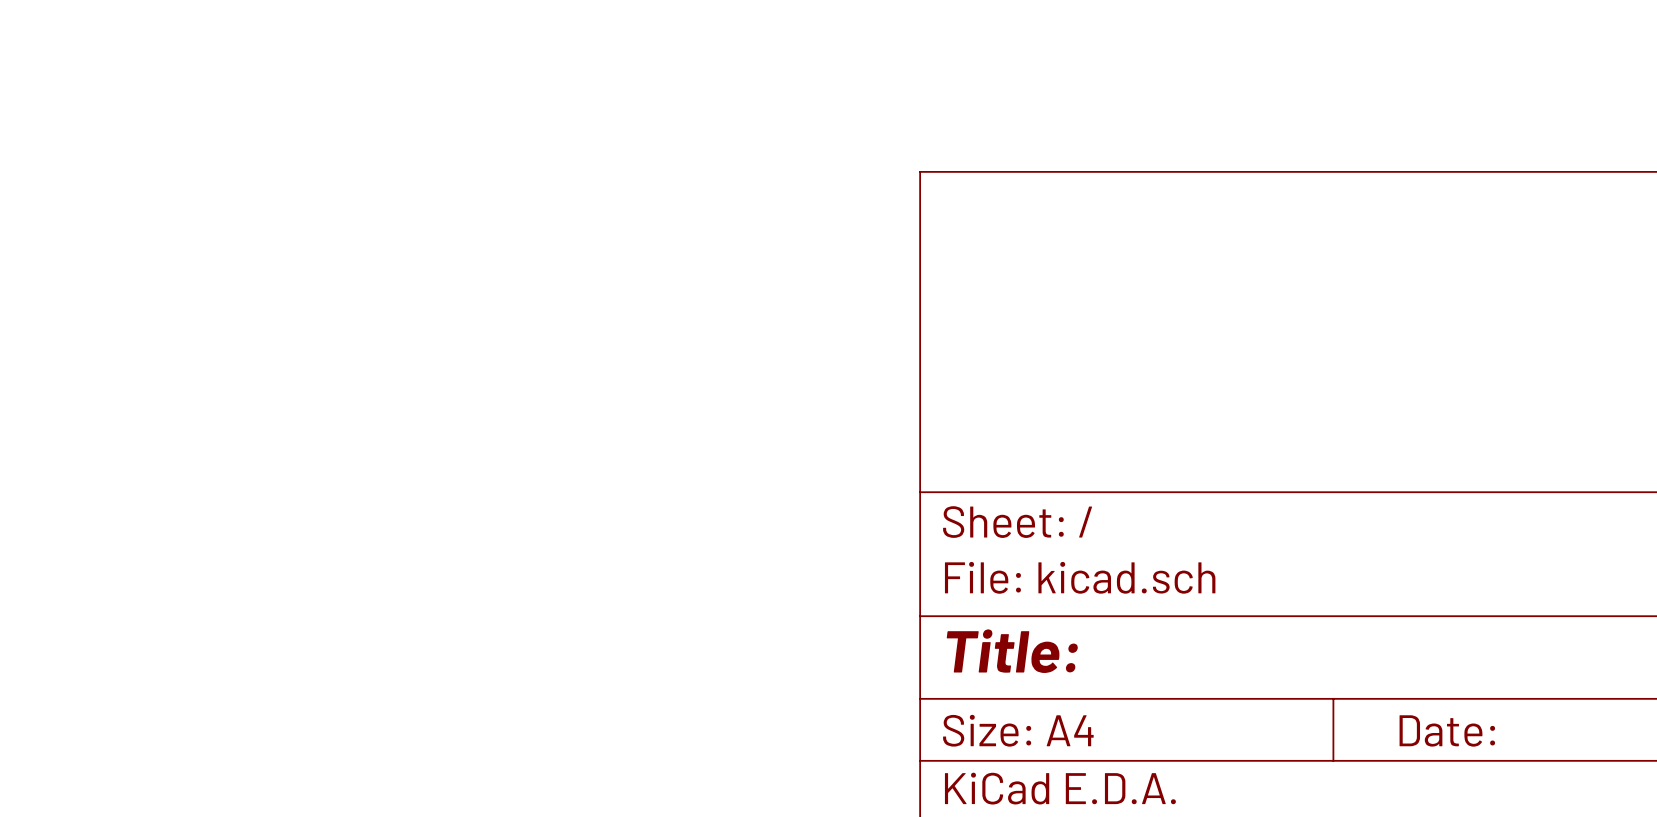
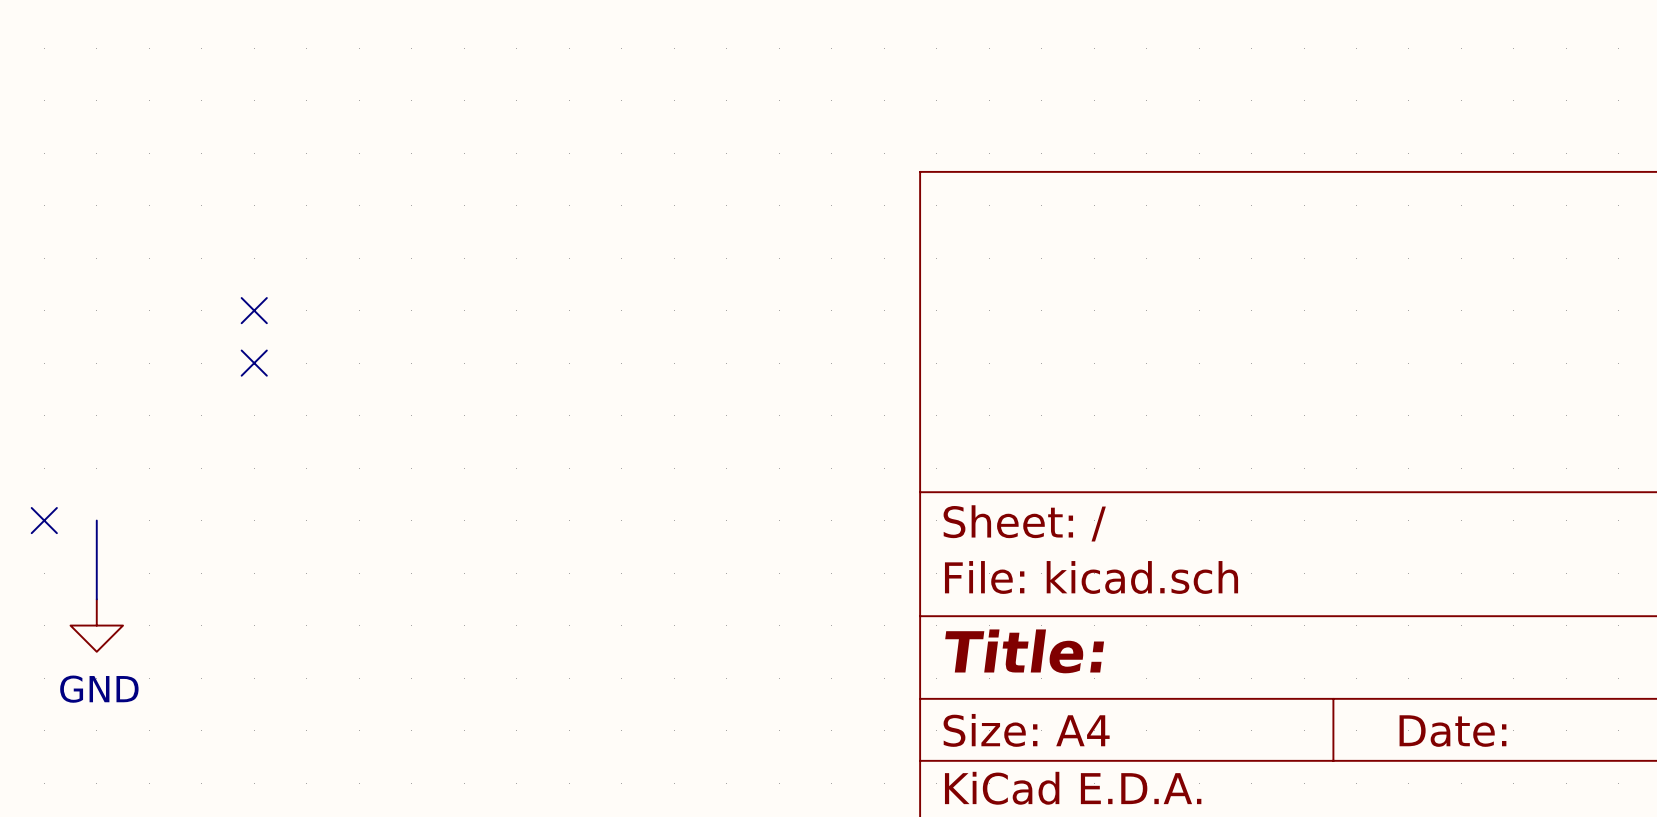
no-connect mark: none -> (254, 310)
no-connect mark: none -> (254, 363)
no-connect mark: none -> (44, 520)
wire: none -> (96, 520) (96, 599)
power symbol: none -> GND (96, 625)

